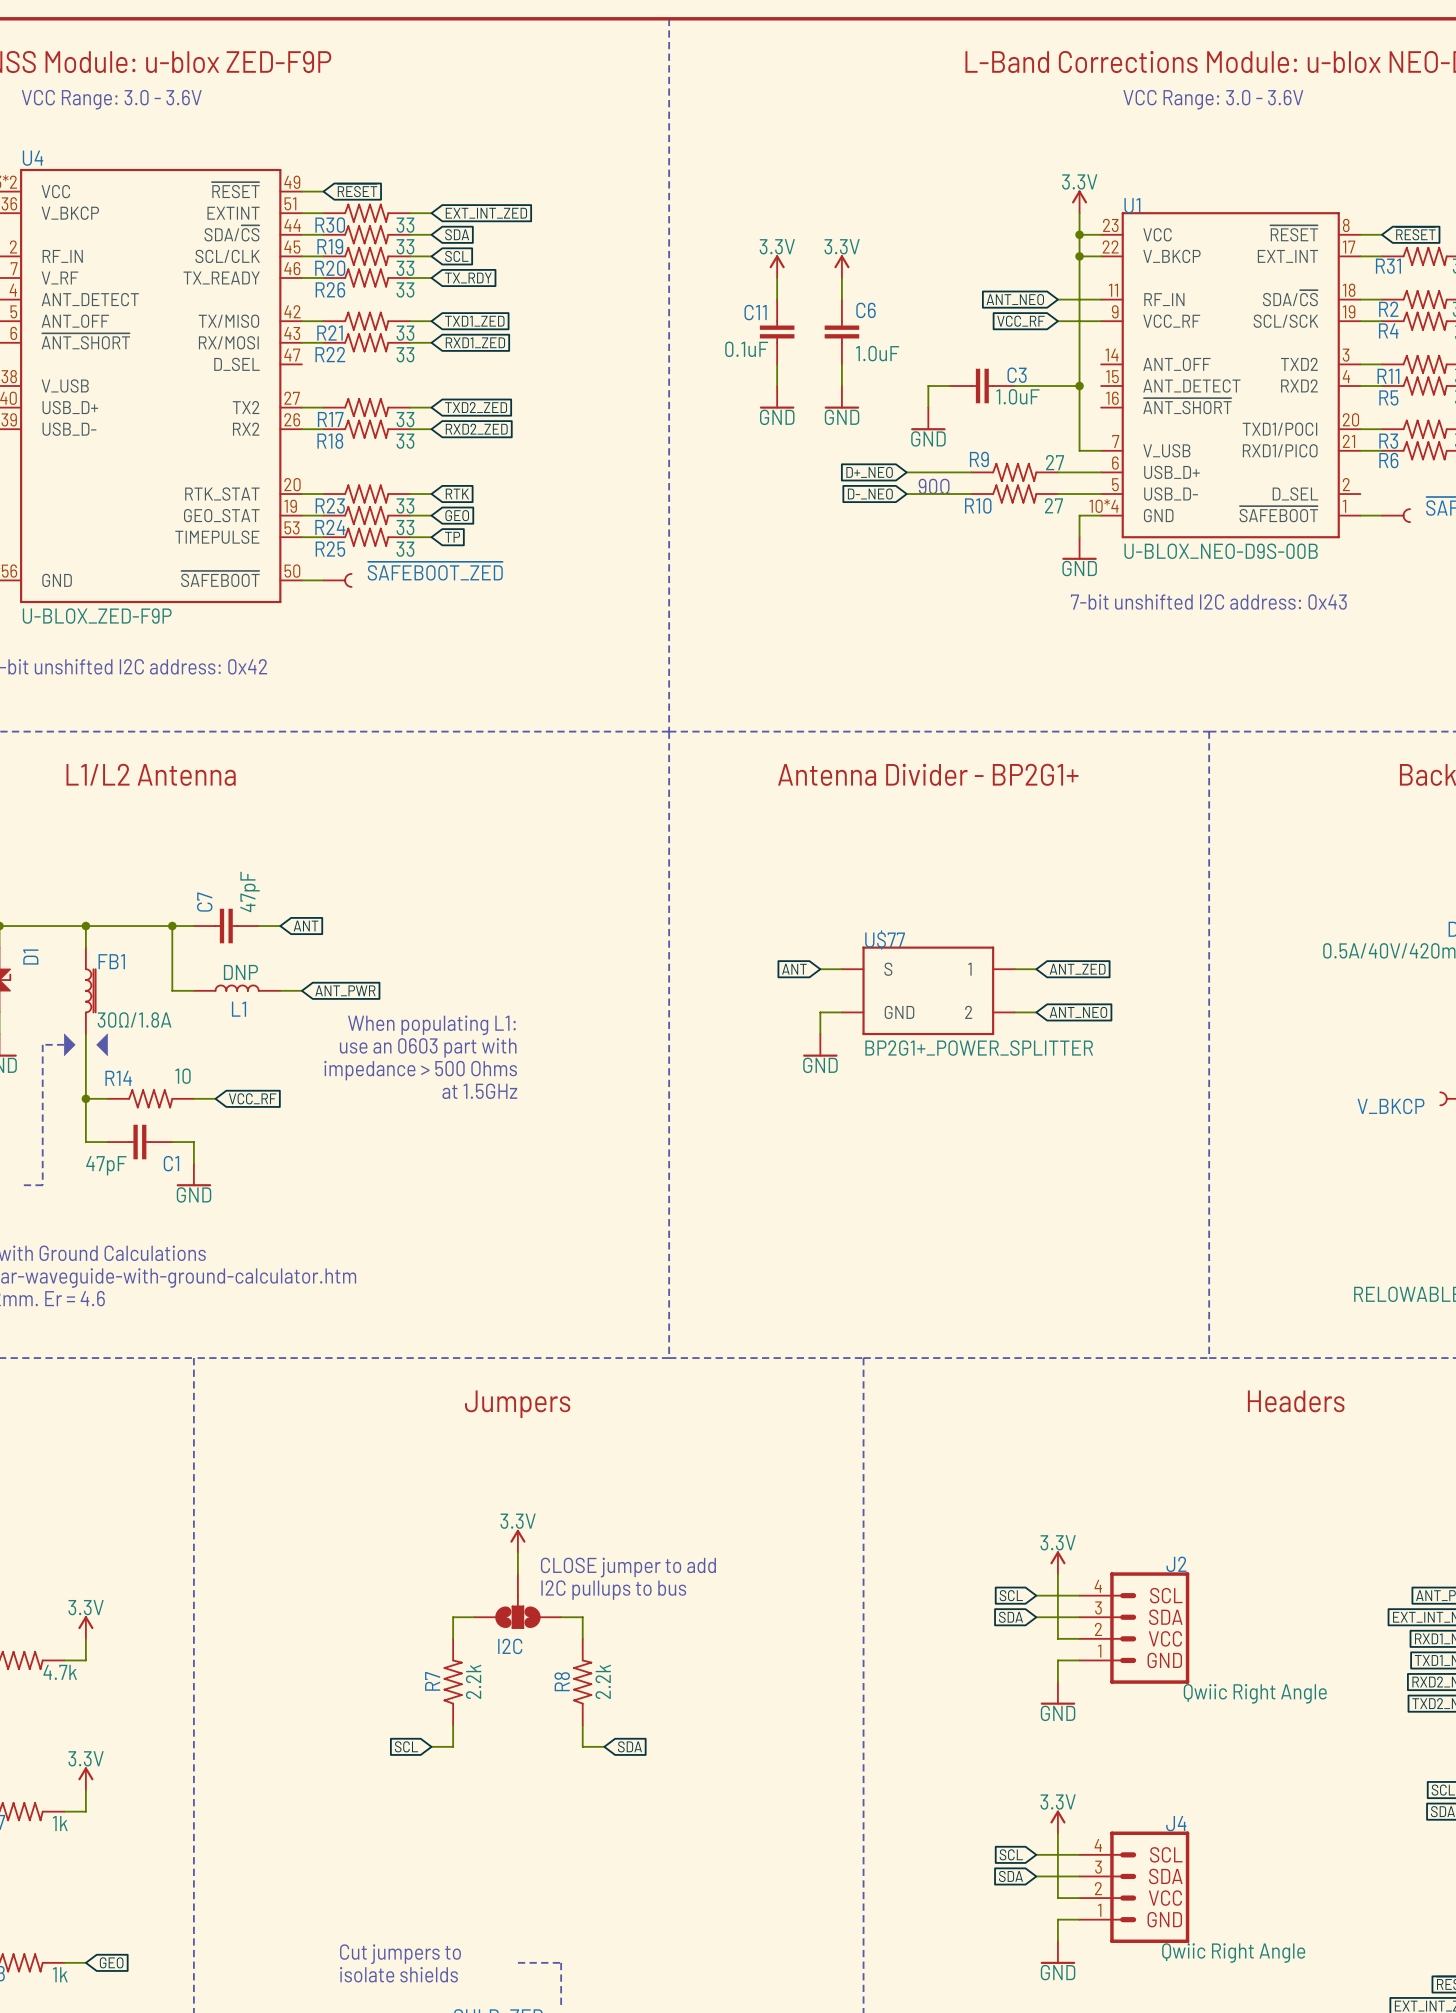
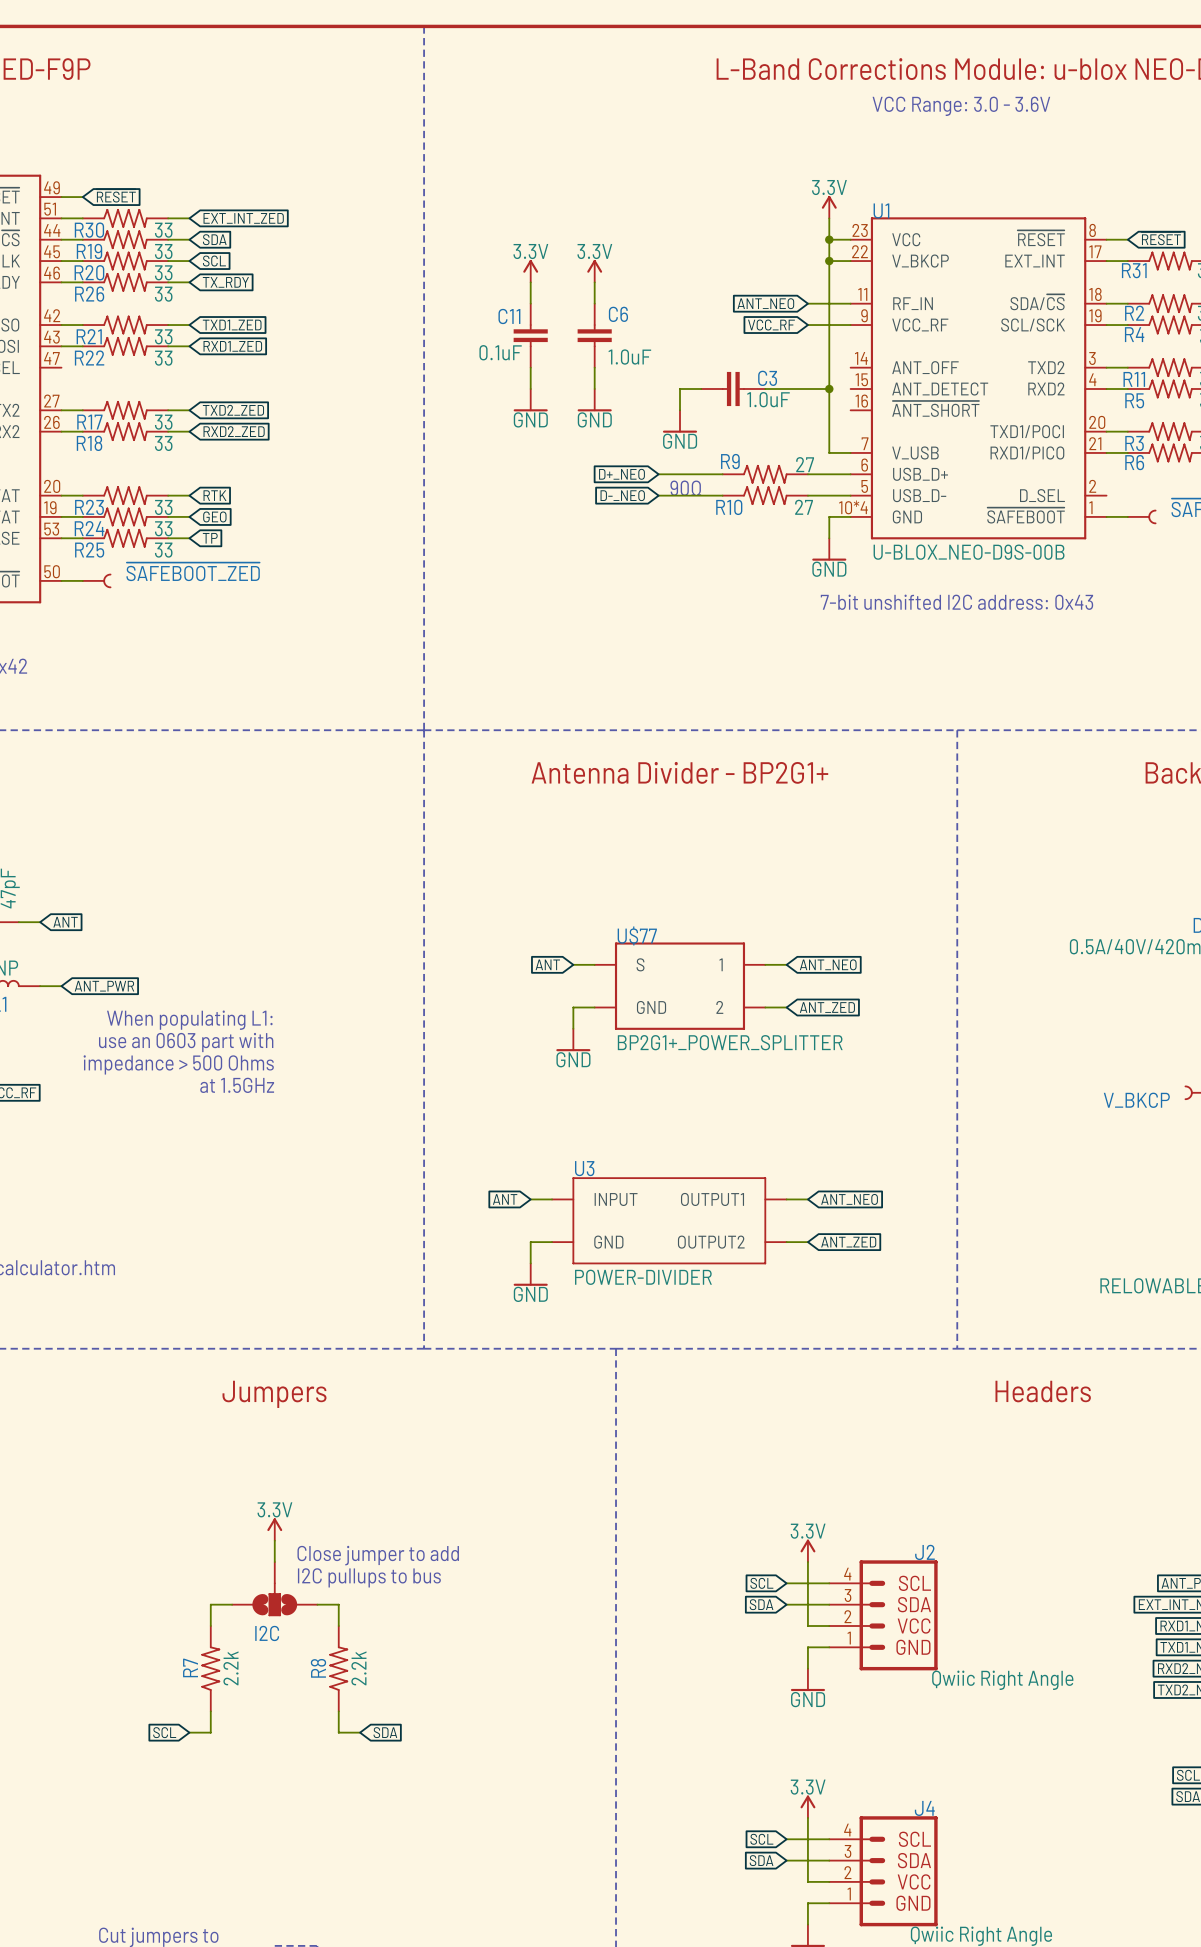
global label: ANT_ZED (1077, 969) -> ANT_NEO (828, 964)
global label: ANT_NEO (1078, 1012) -> ANT_ZED (827, 1007)
global label: none -> ANT (505, 1199)
wire: none -> (530, 1199) (552, 1199)
wire: none -> (786, 1199) (807, 1199)
global label: none -> ANT_NEO (849, 1199)
U3: none -> POWER-DIVIDER (669, 1220)
wire: none -> (552, 1242) (530, 1242) (530, 1263)
wire: none -> (786, 1242) (807, 1242)
global label: none -> ANT_ZED (848, 1242)
power symbol: none -> GND (530, 1274)
text: CLOSE jumper to add (628, 1567) -> Close jumper to add (378, 1555)

